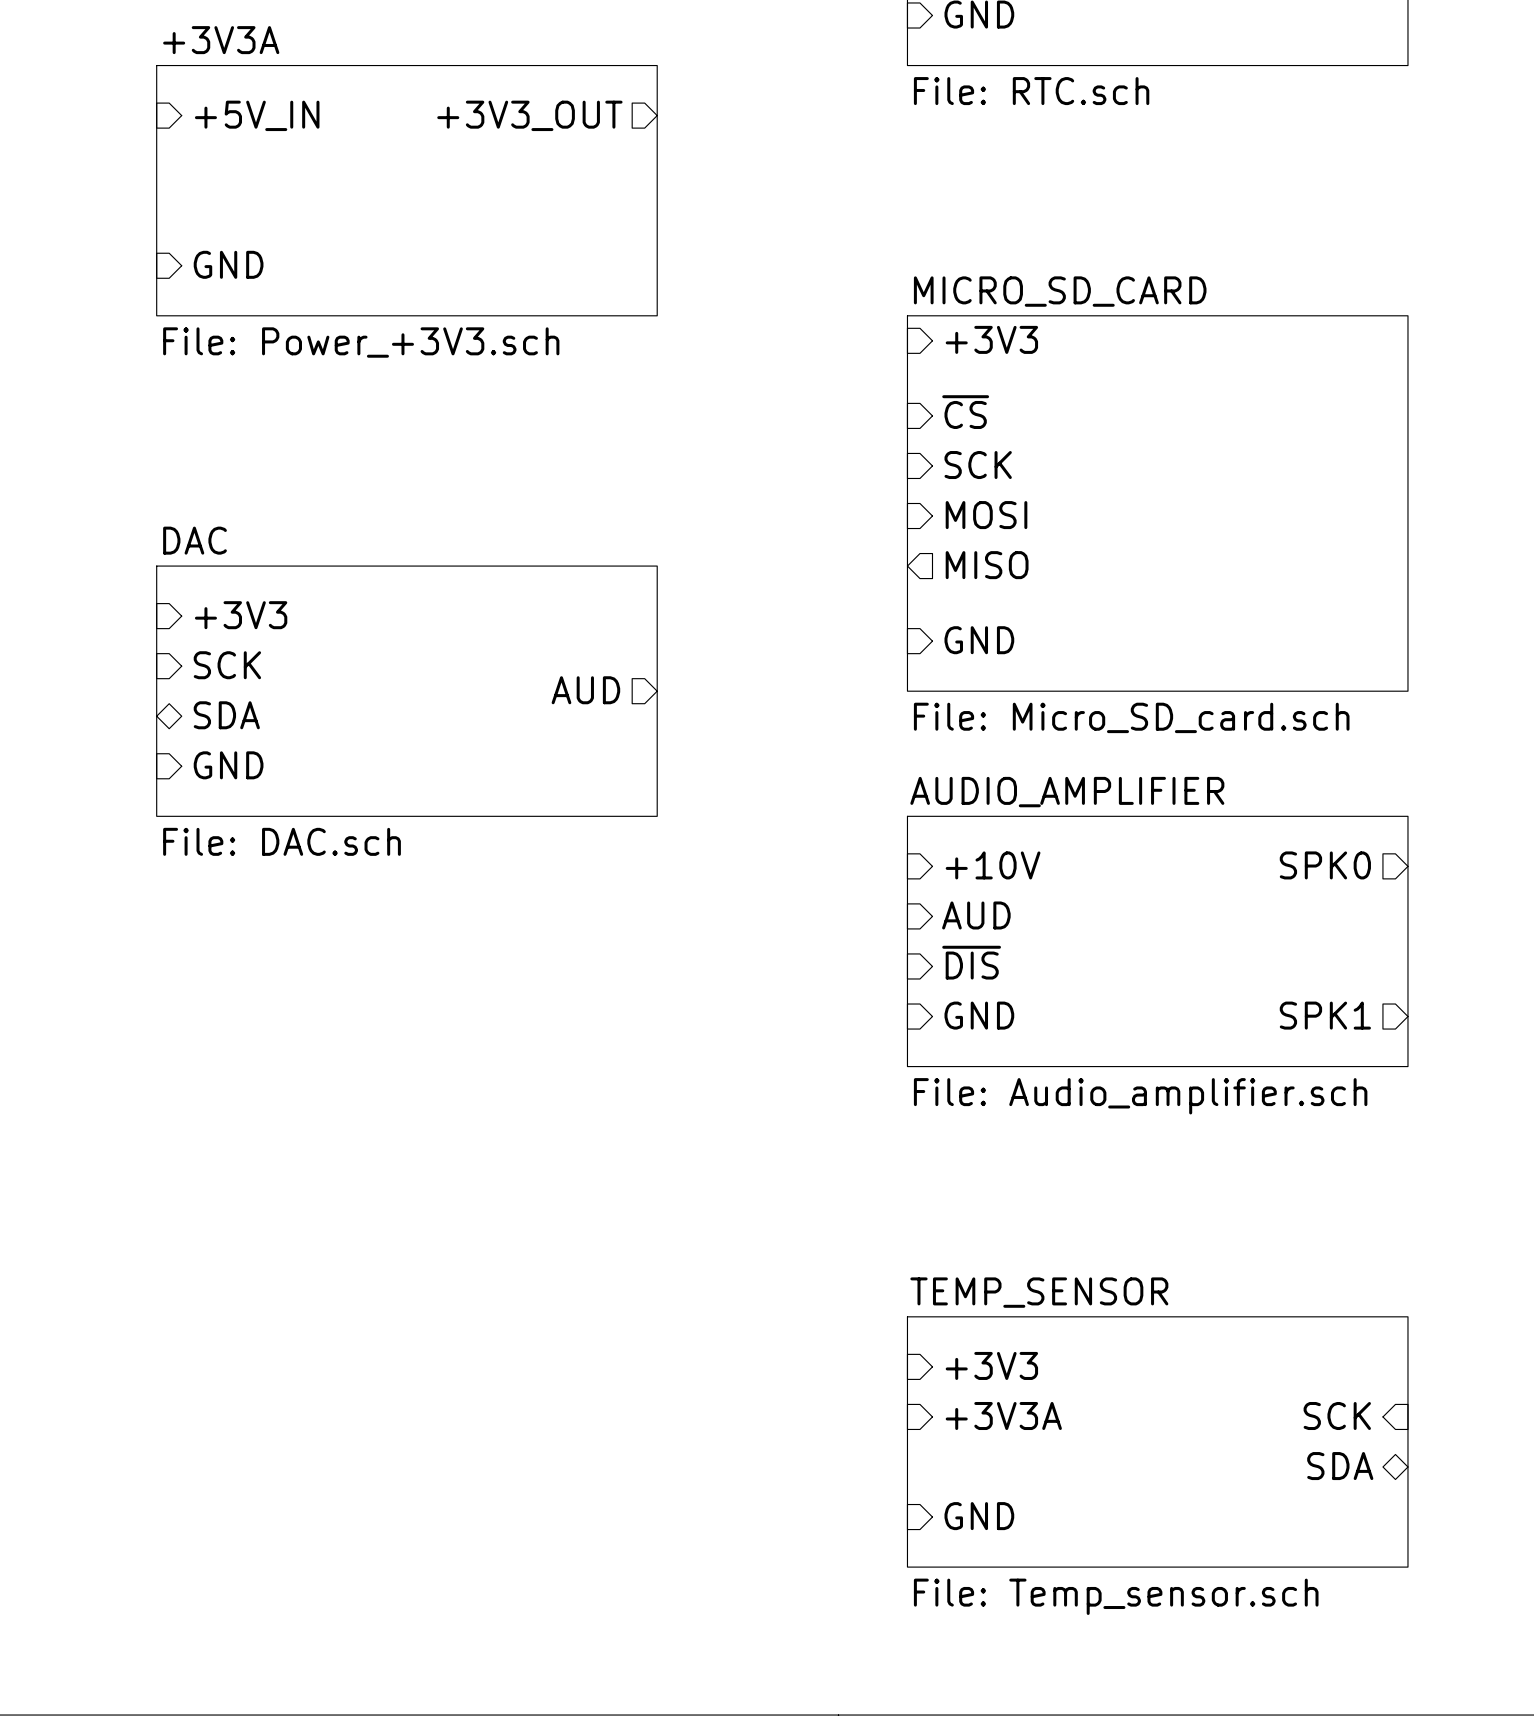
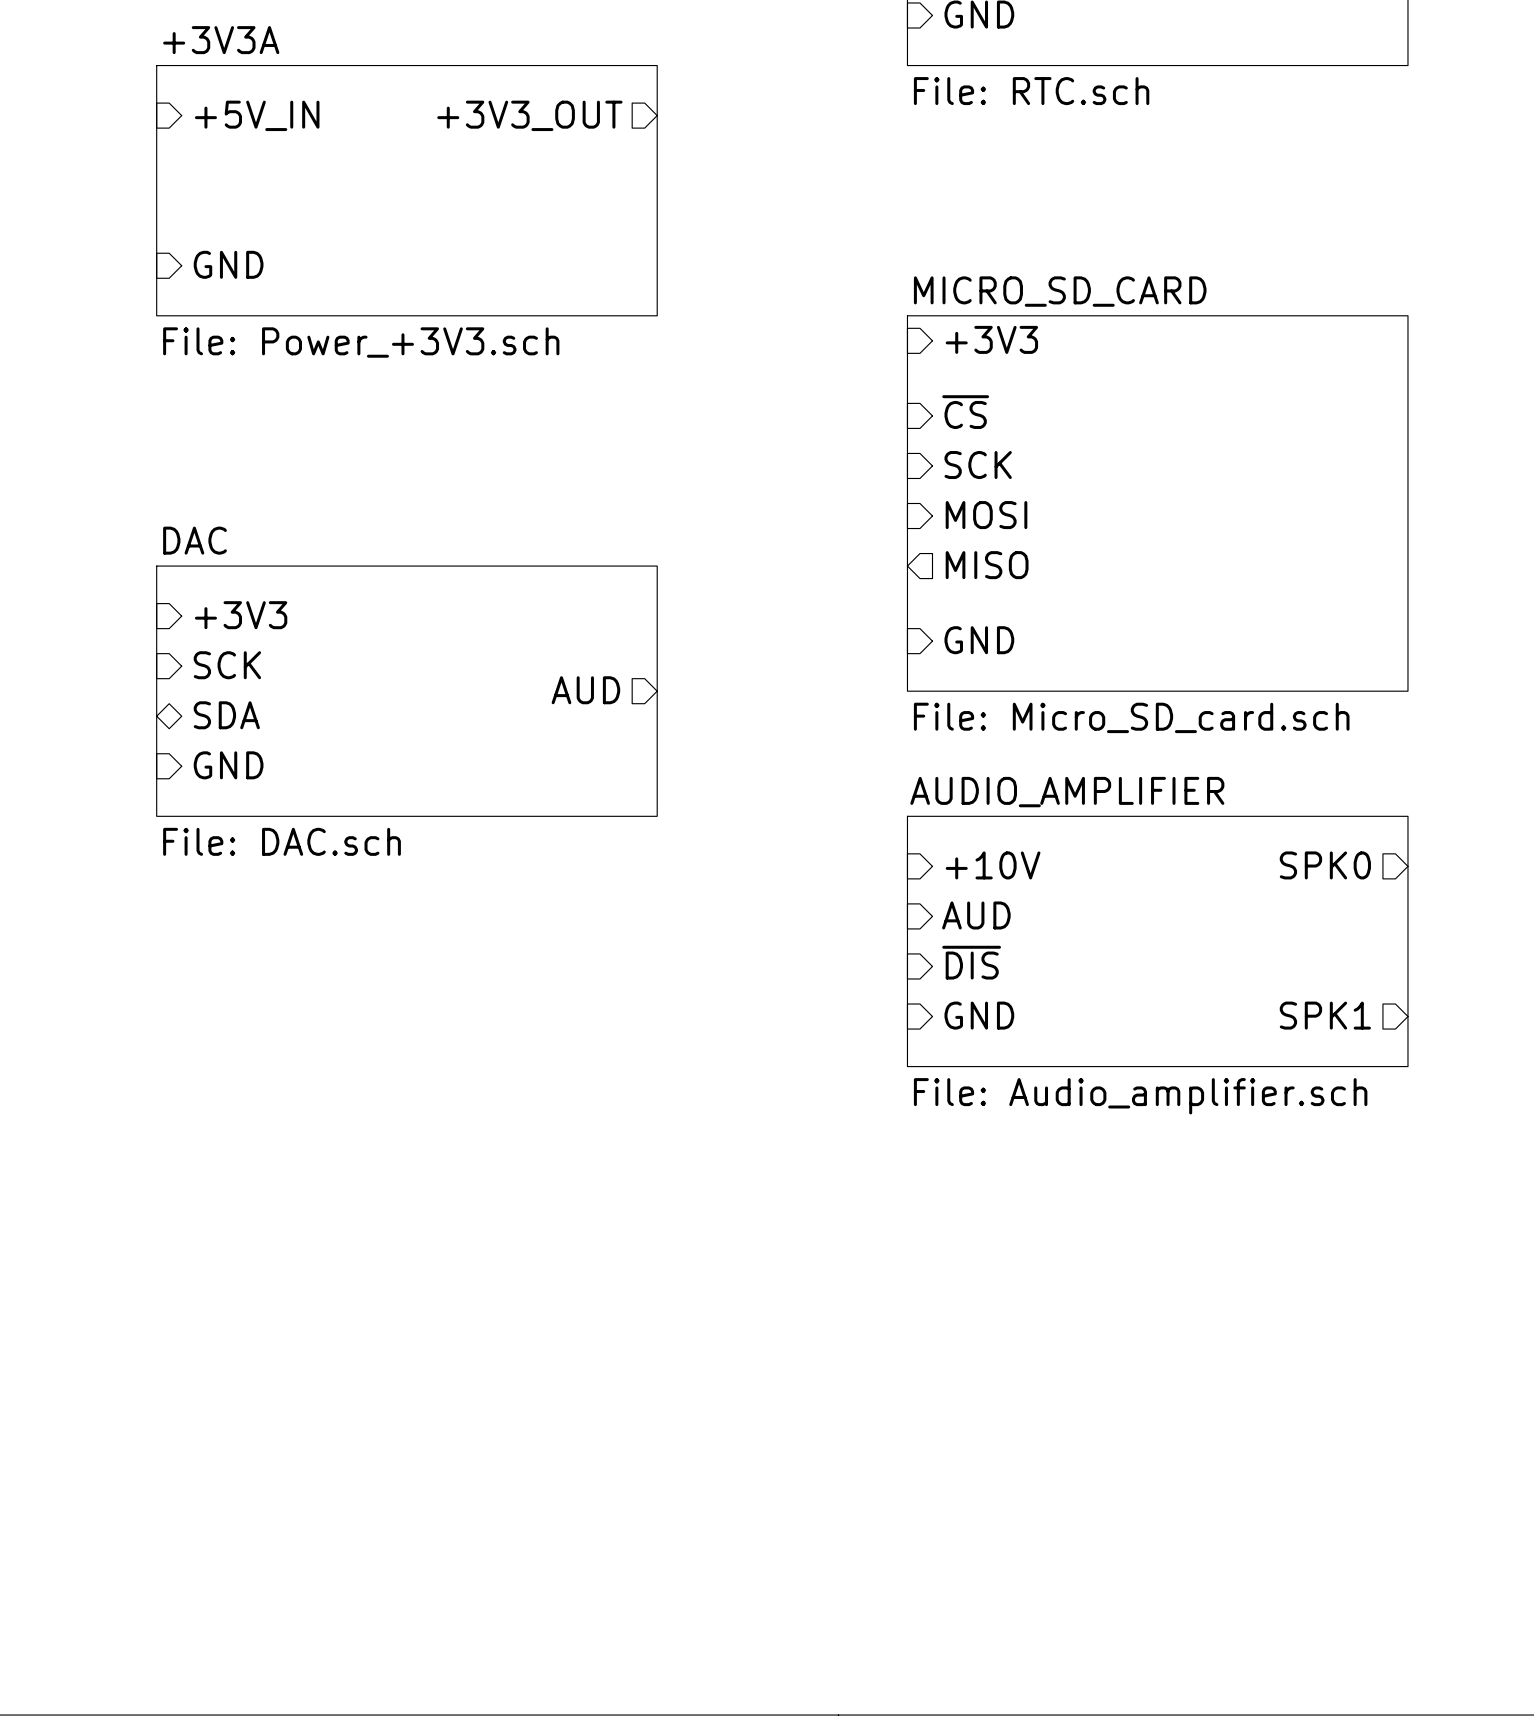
sheet pin: +3V3 (991, 1365) -> none
sheet pin: +3V3A (1003, 1416) -> none
sheet pin: SCK (1337, 1416) -> none
sheet TEMP_SENSOR: File: Temp_sensor.sch (1157, 1441) -> none
sheet pin: SDA (1340, 1466) -> none
sheet pin: GND (979, 1516) -> none

